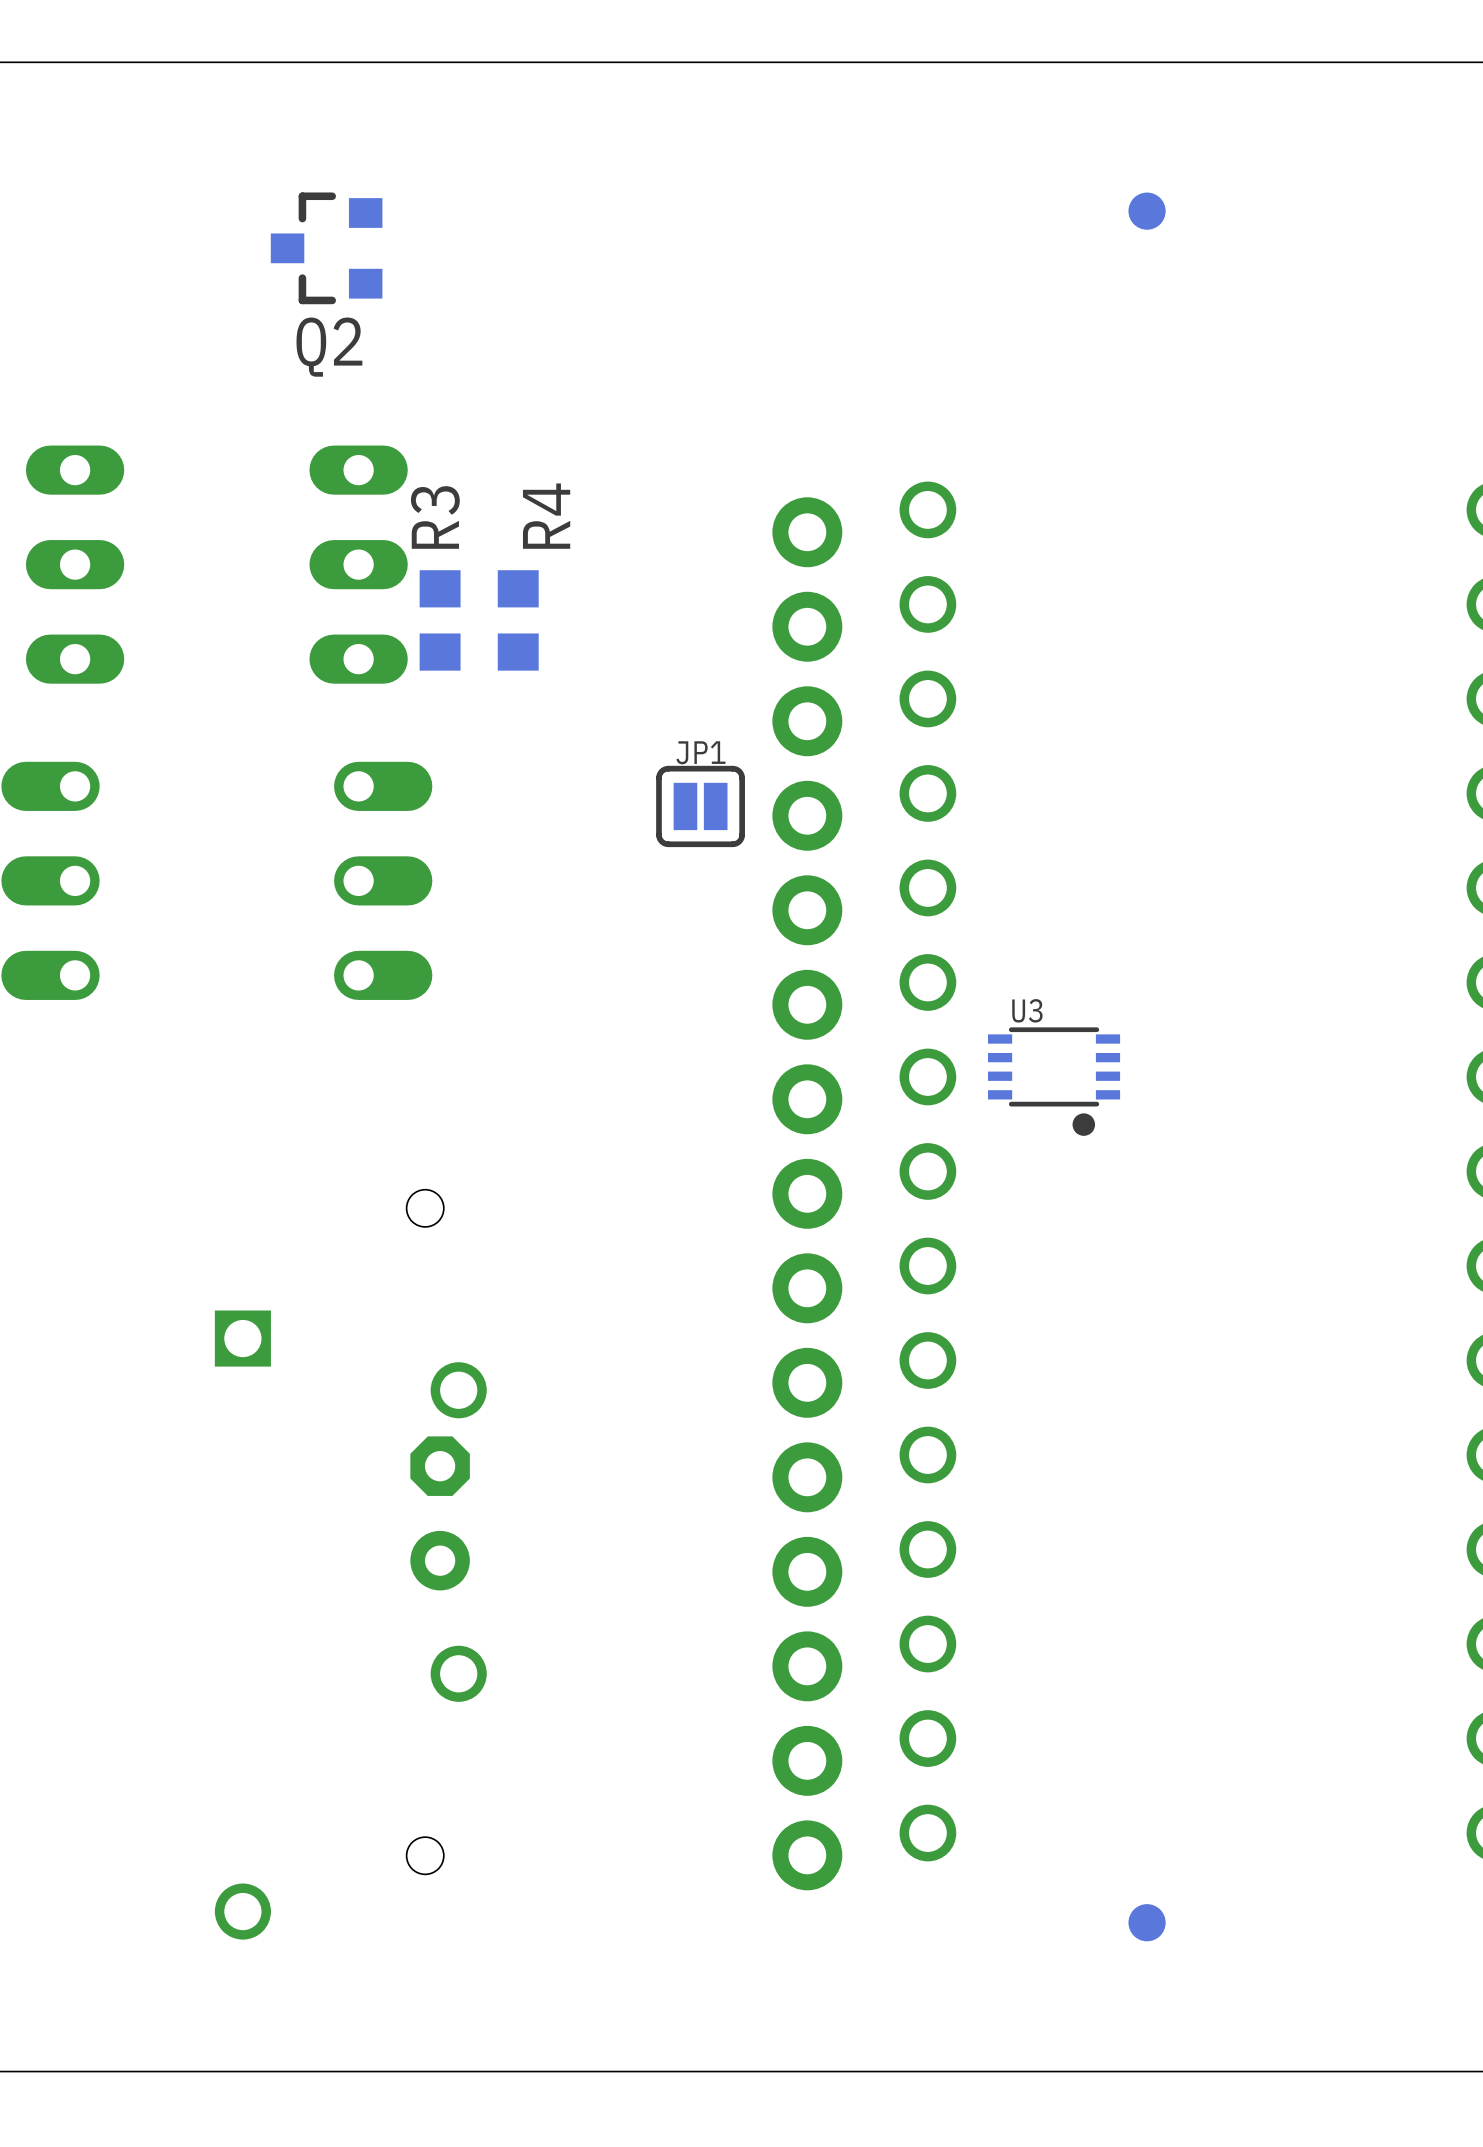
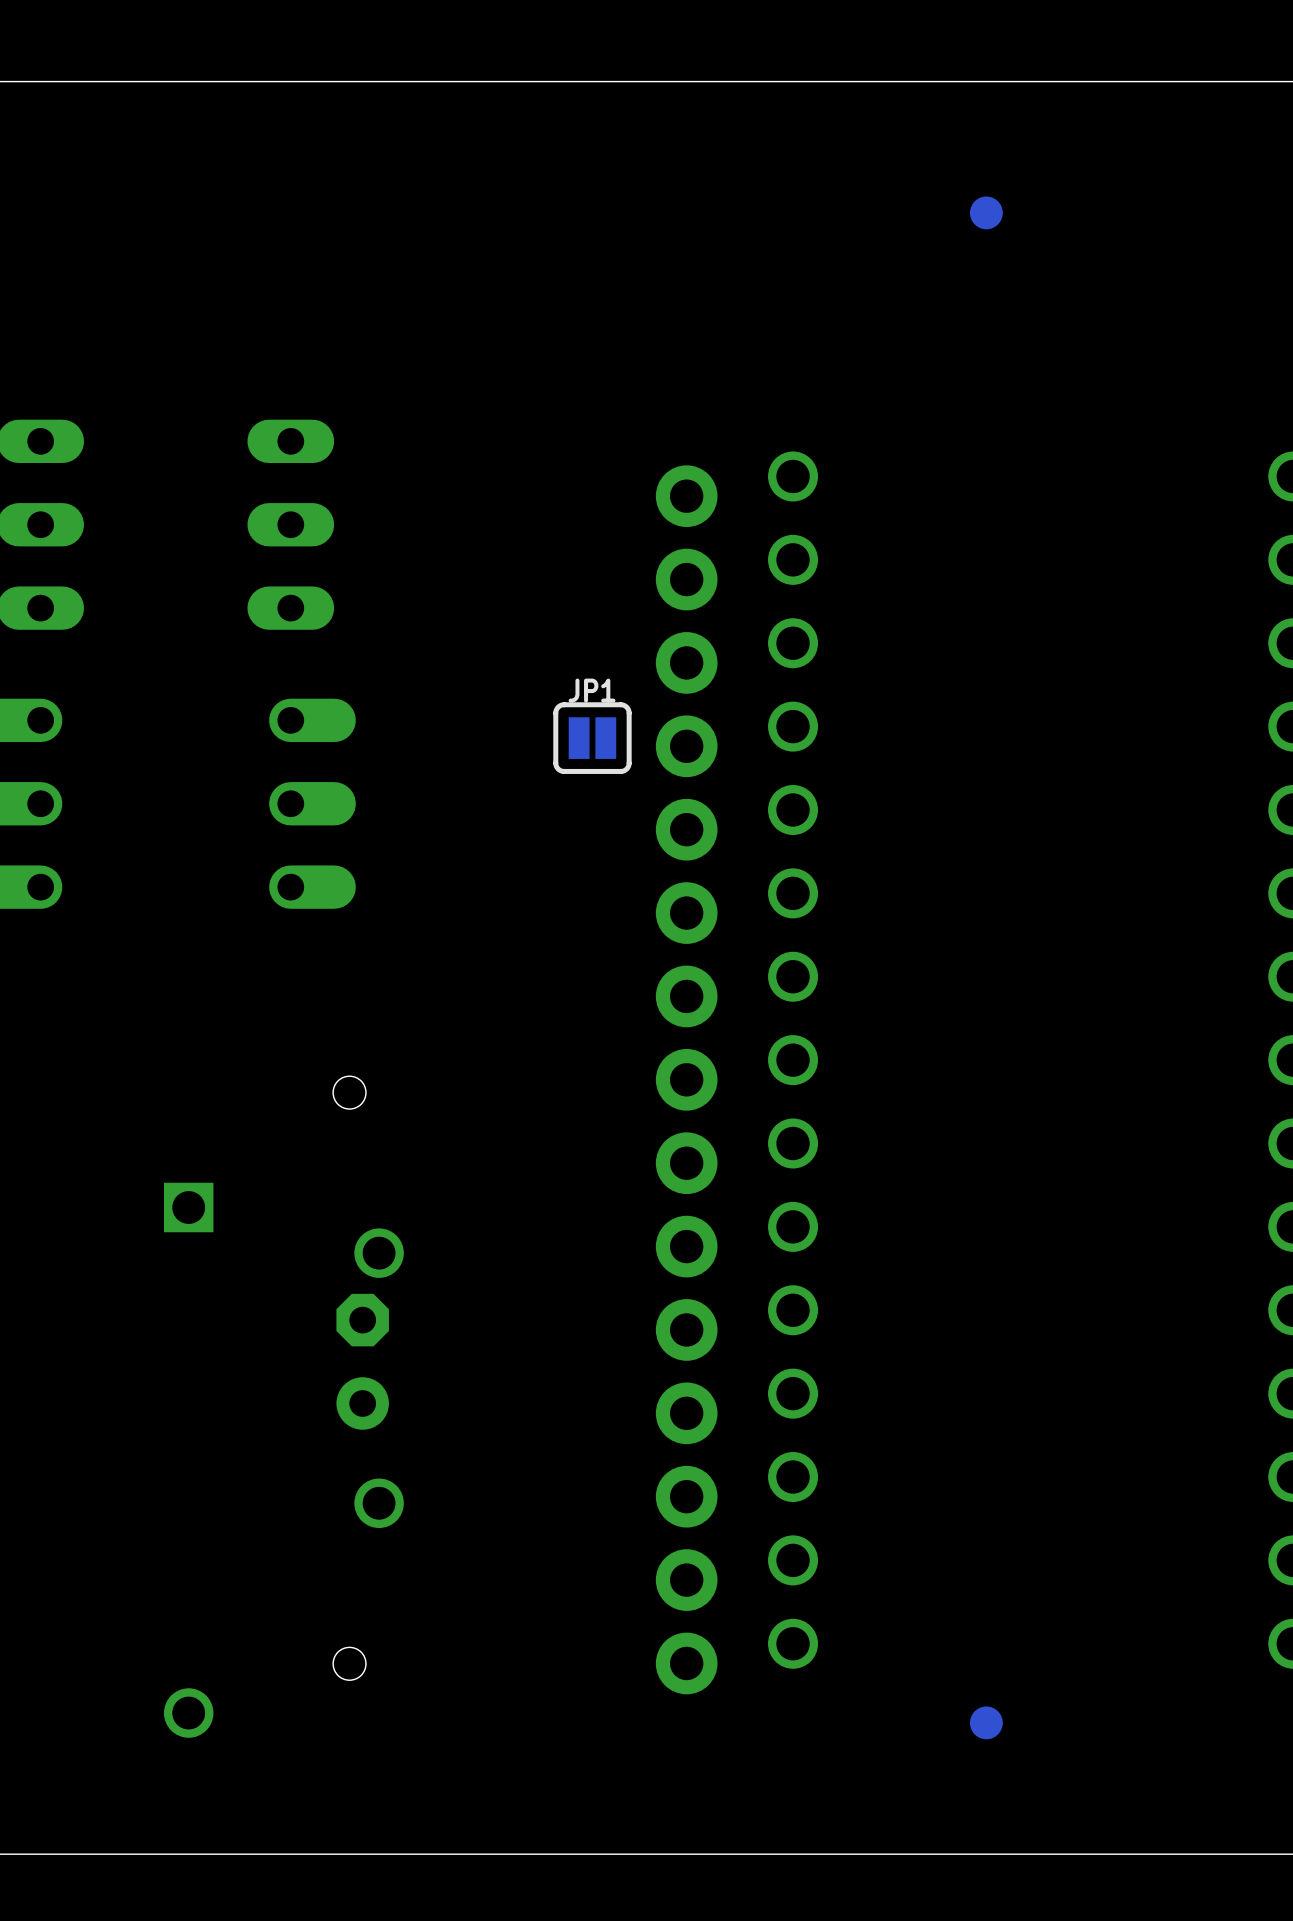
Q2: (326, 248) -> none
R3: (440, 620) -> none
R4: (518, 620) -> none
U3: (1054, 1081) -> none

